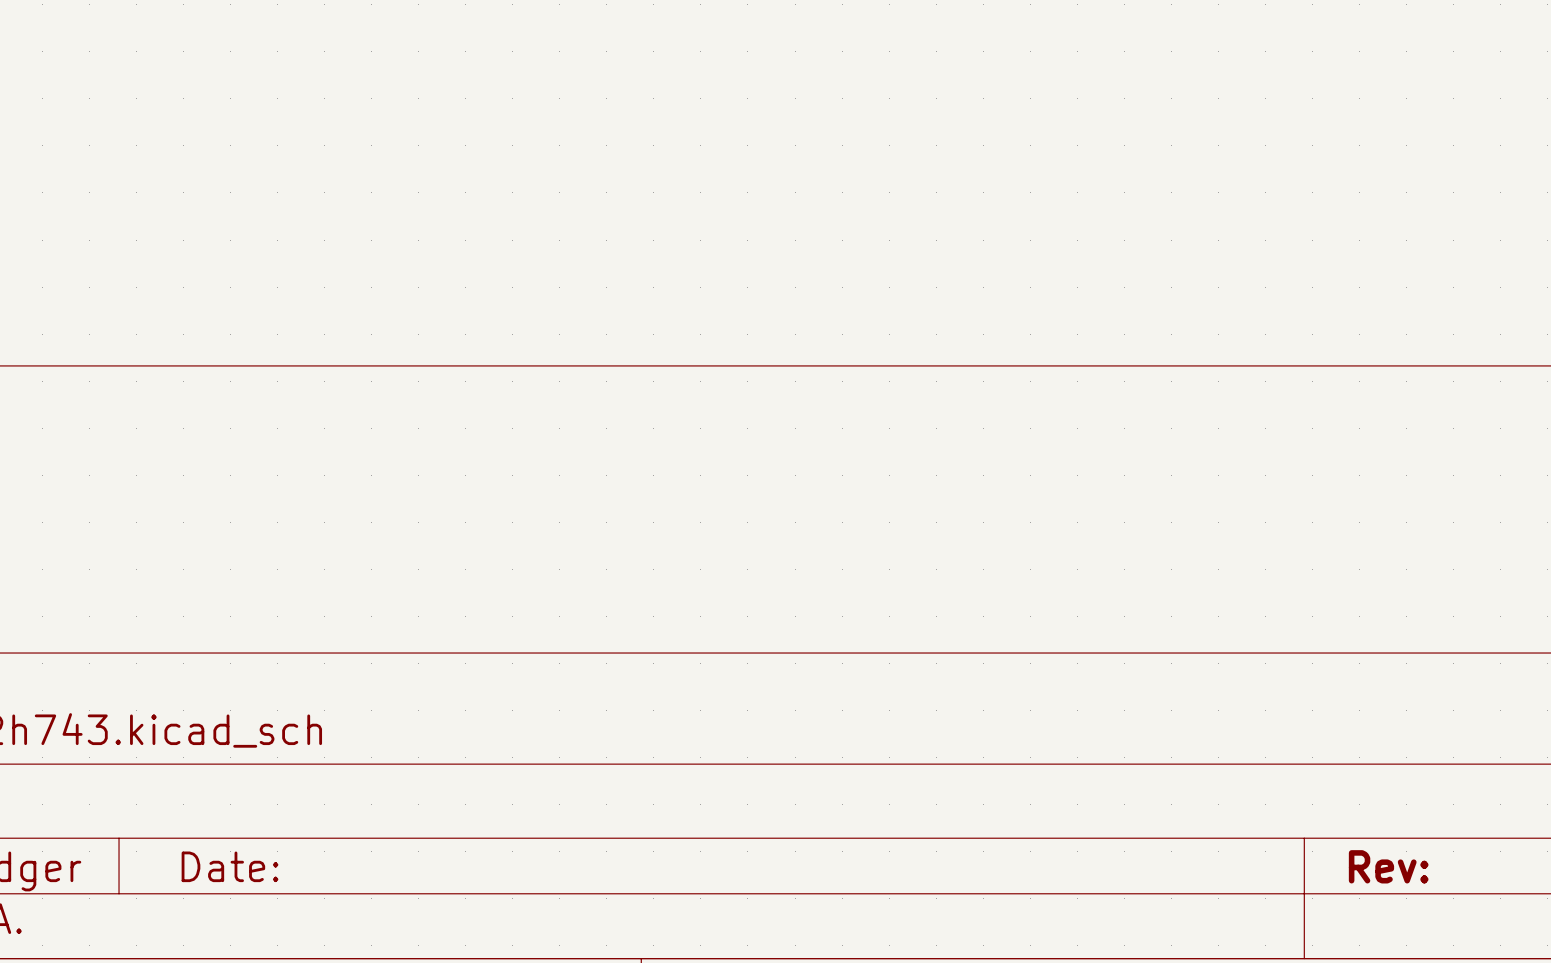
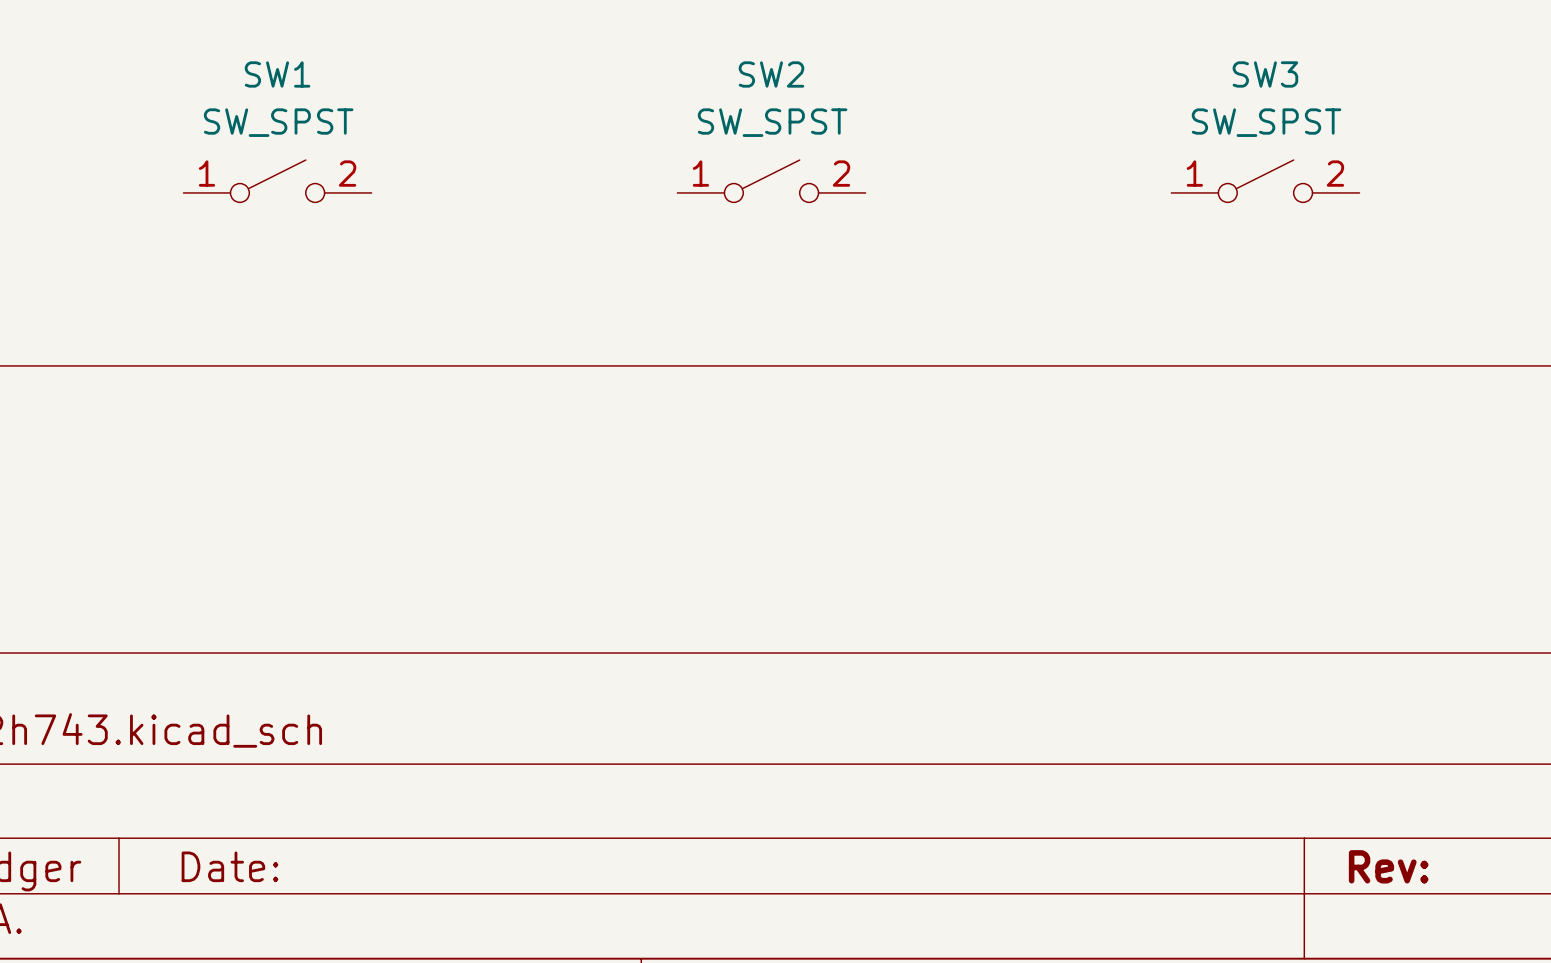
SW1: none -> SW_SPST (277, 181)
SW2: none -> SW_SPST (771, 181)
SW3: none -> SW_SPST (1265, 181)

